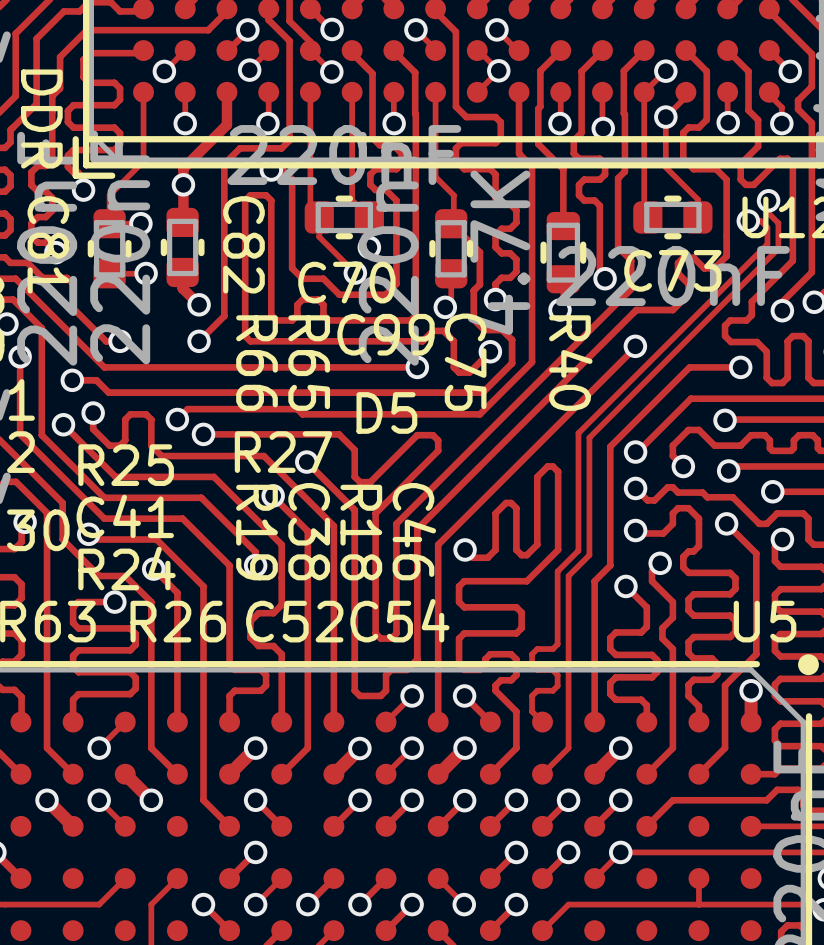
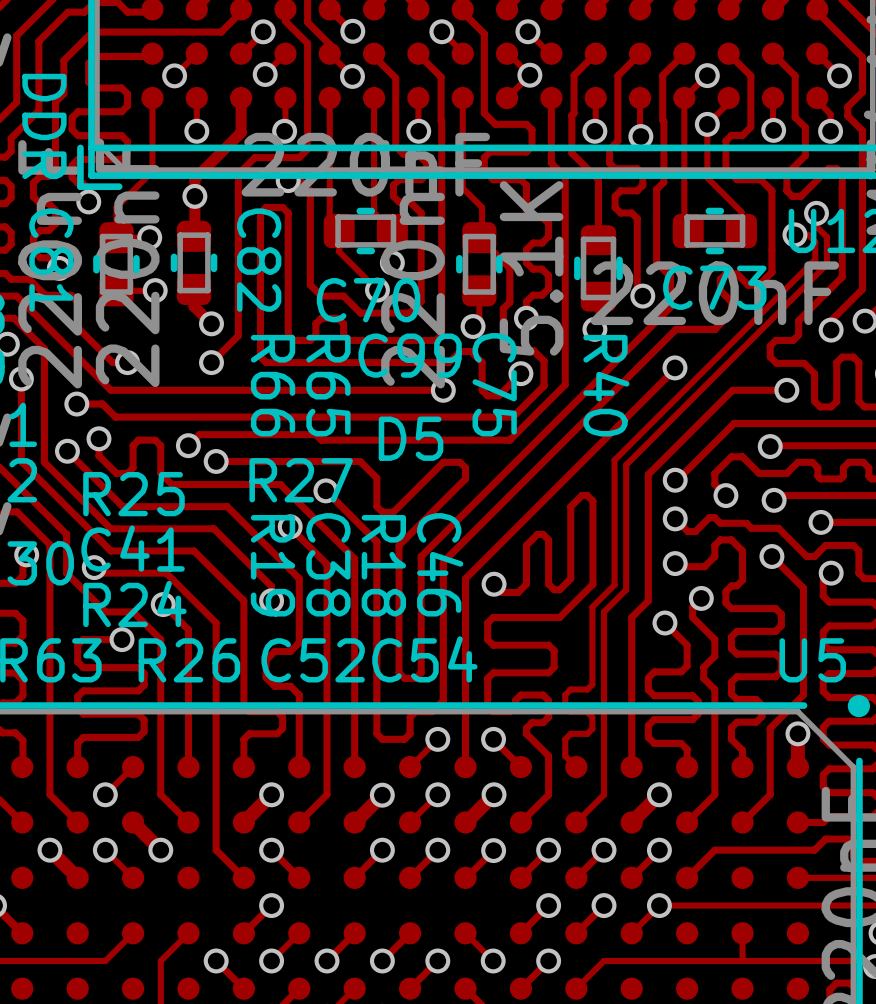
R40 value: 4.7K (499, 252) -> 5.1K (531, 268)

